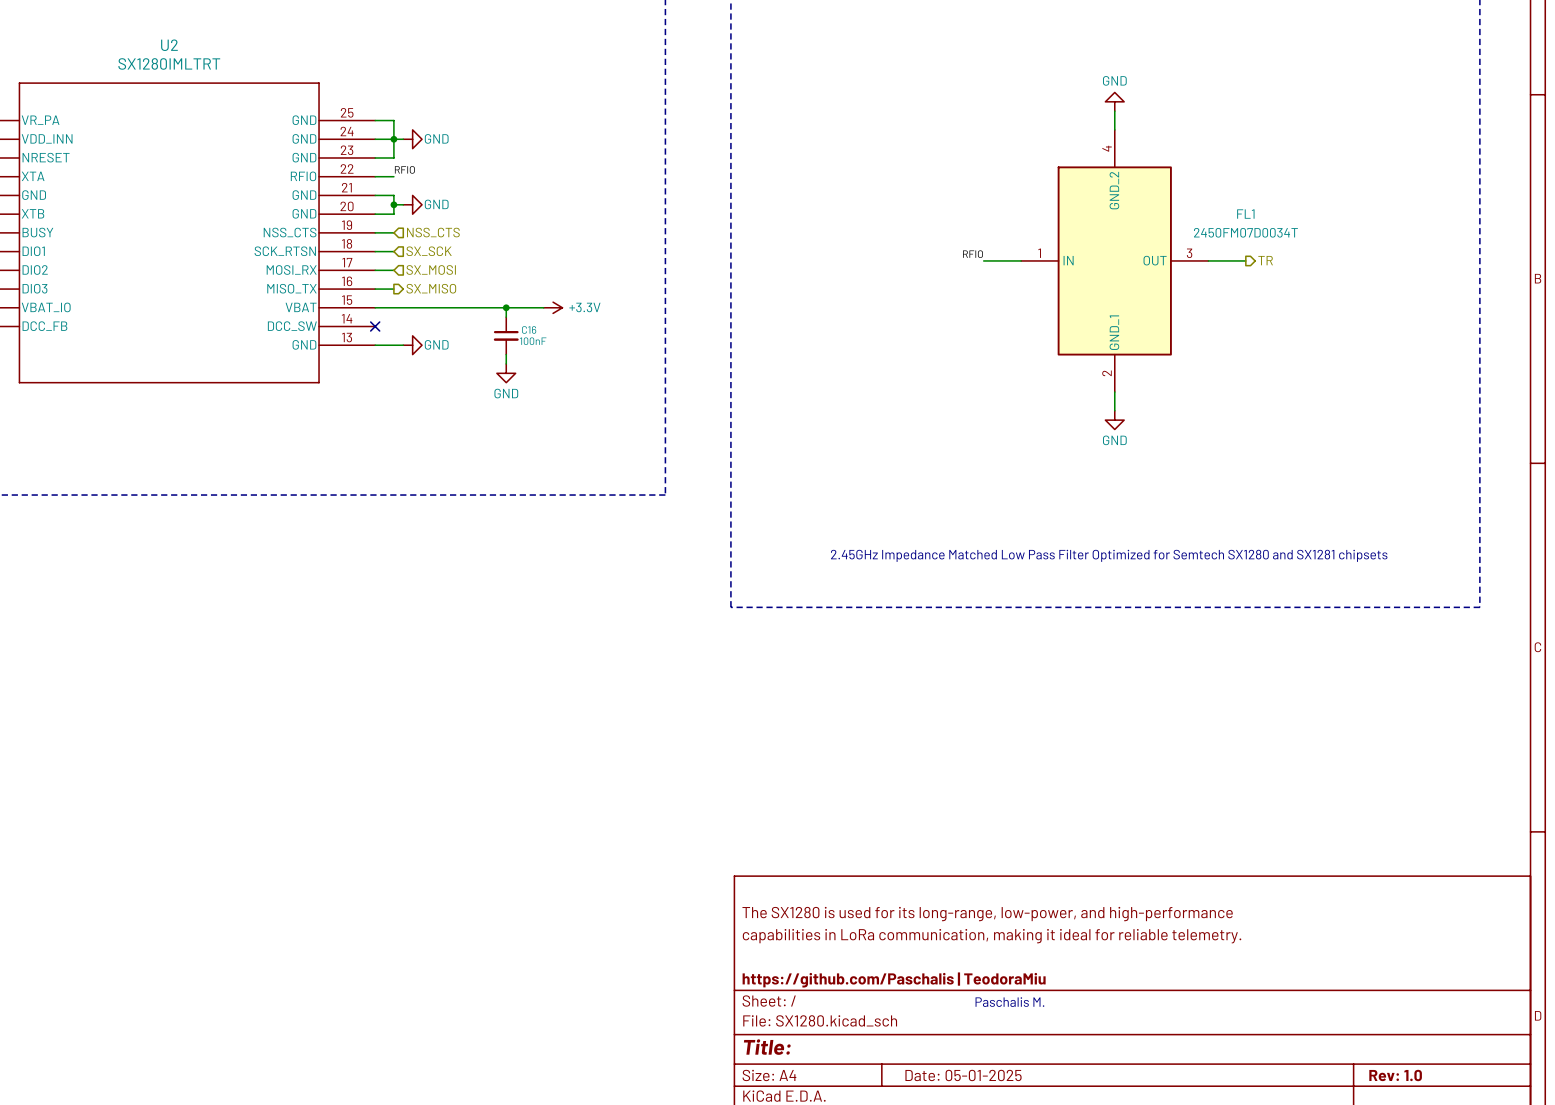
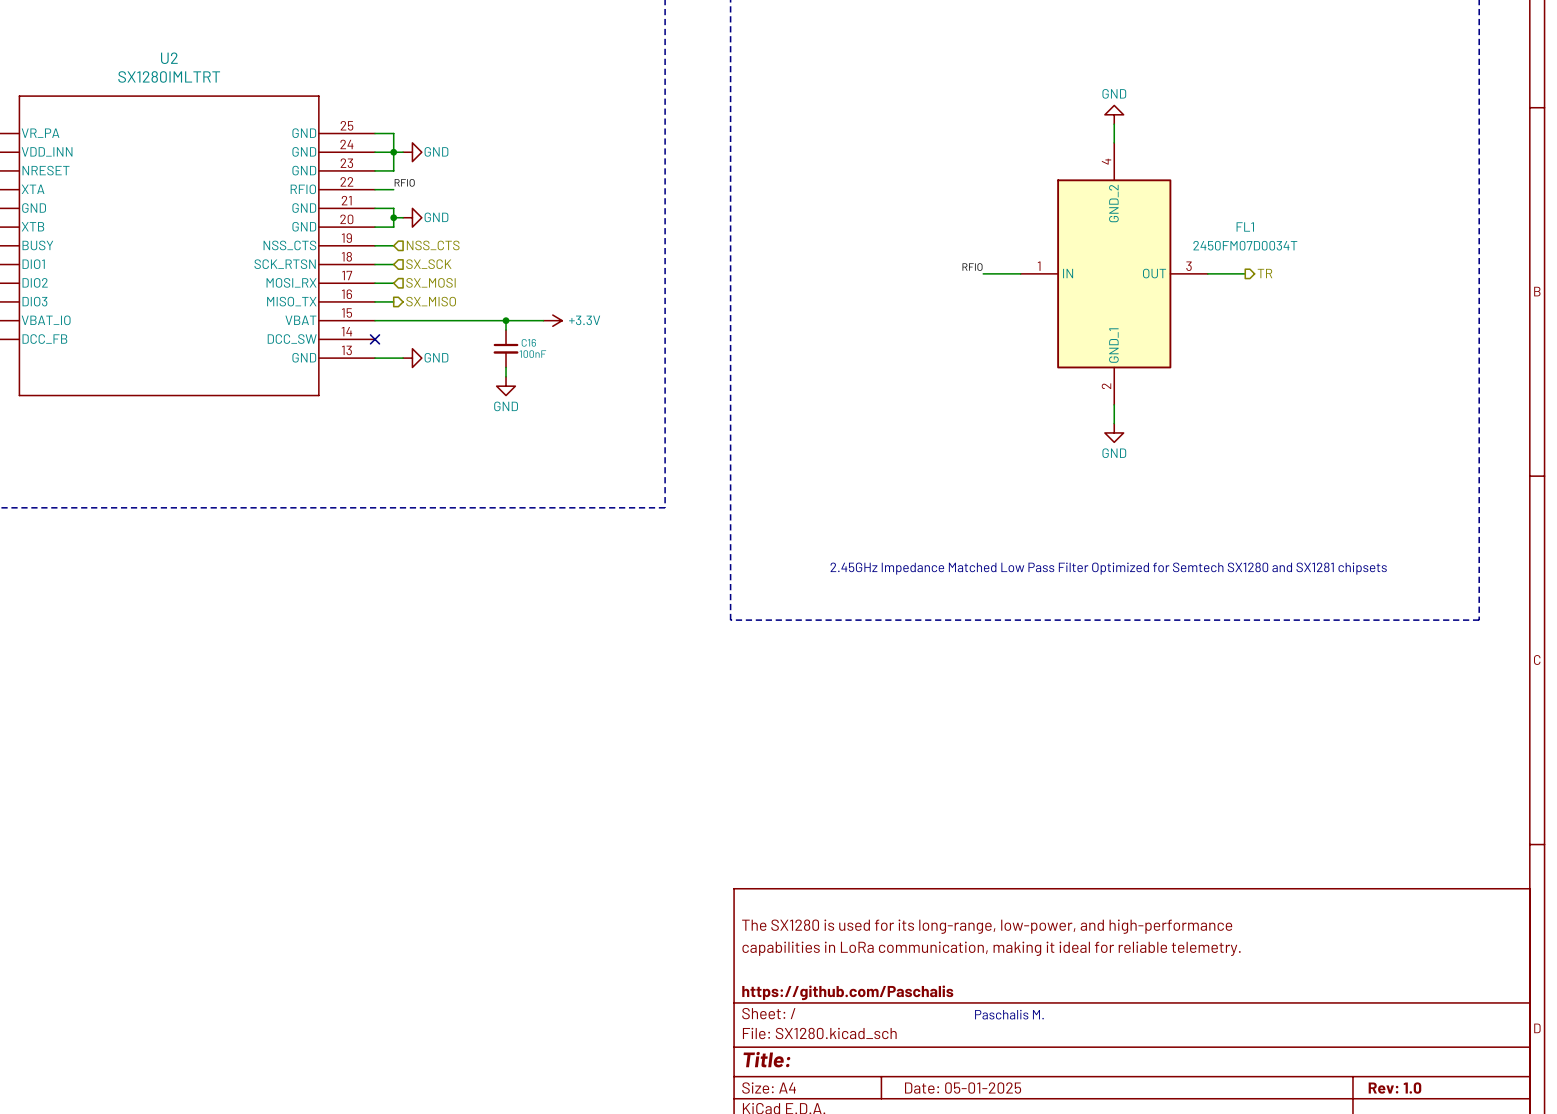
title block: https://github.com/Paschalis | TeodoraMiu (894, 979) -> https://github.com/Paschalis (847, 992)

